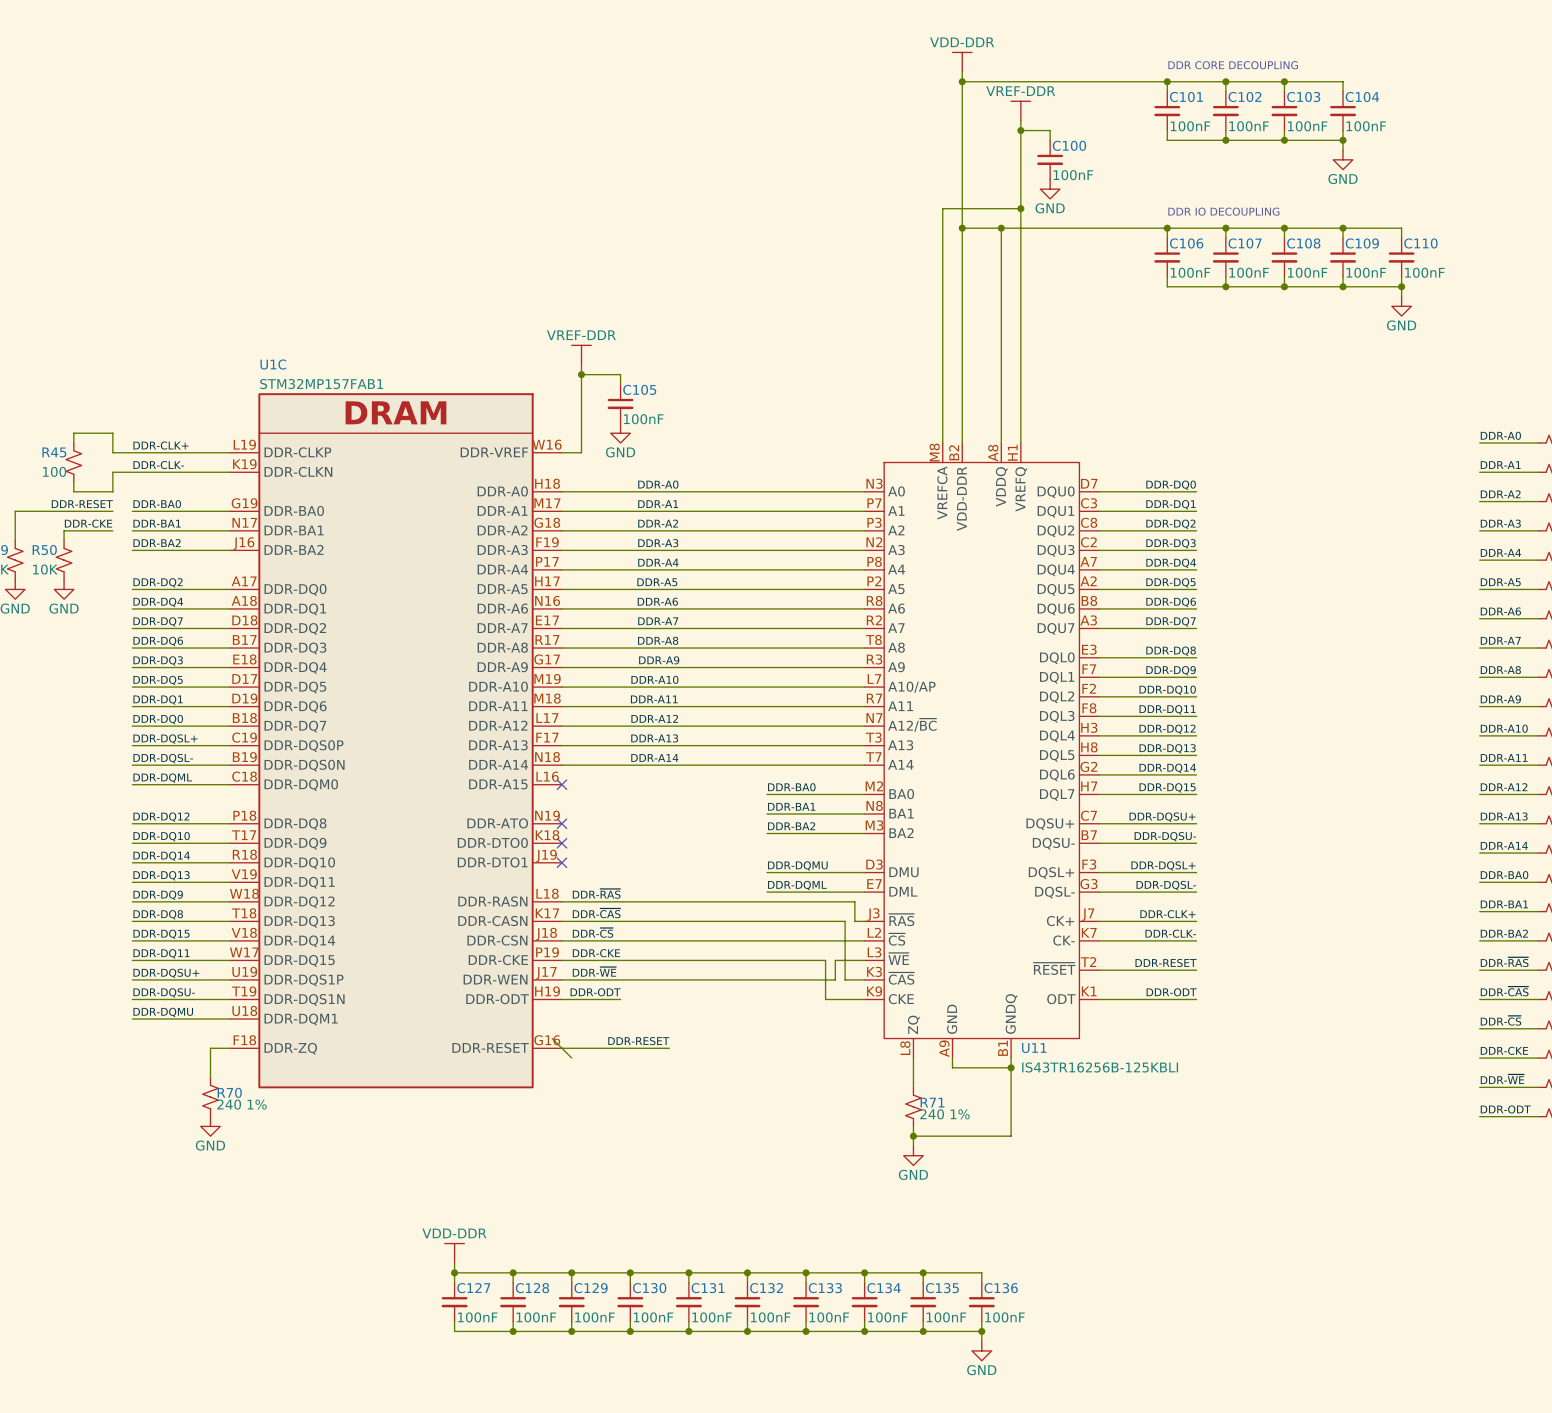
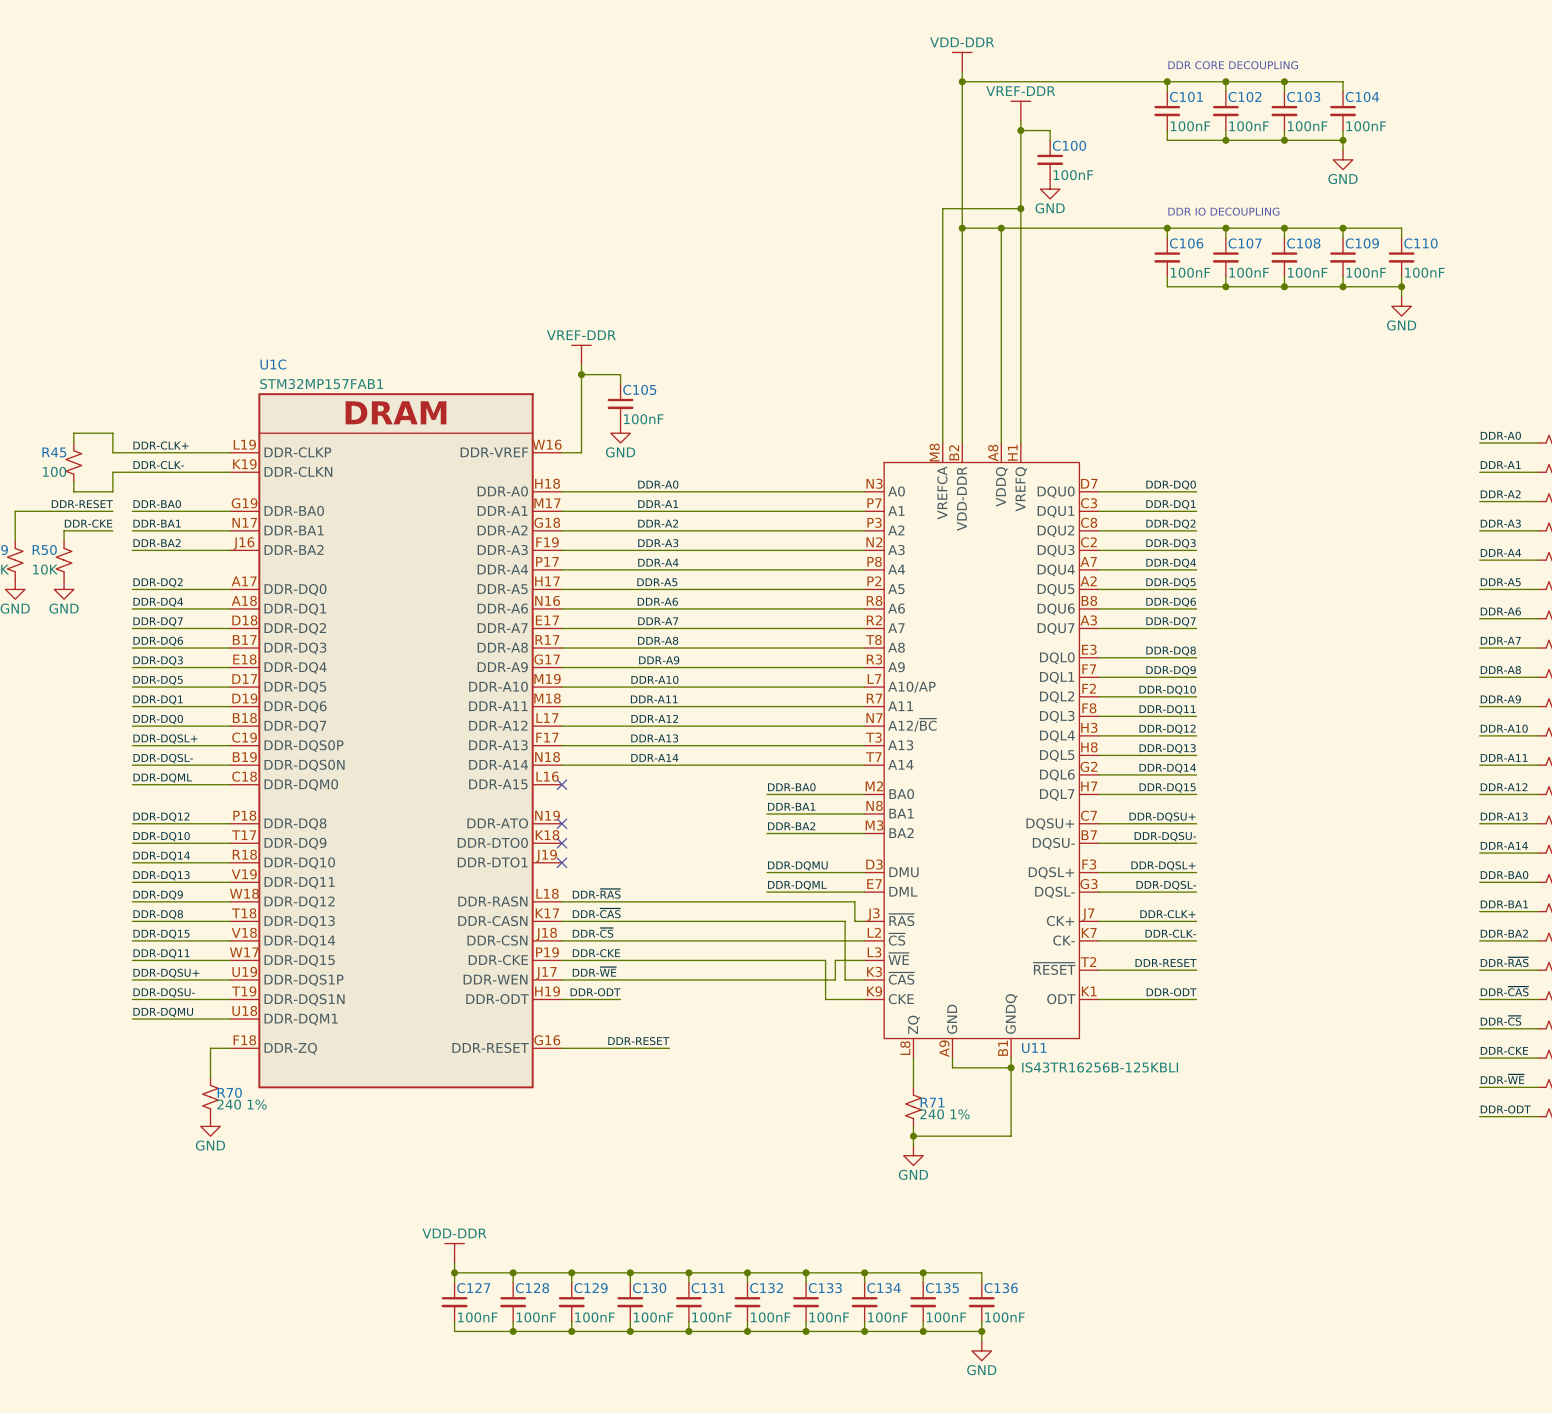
wire: (552, 1038) (571, 1058) -> none

